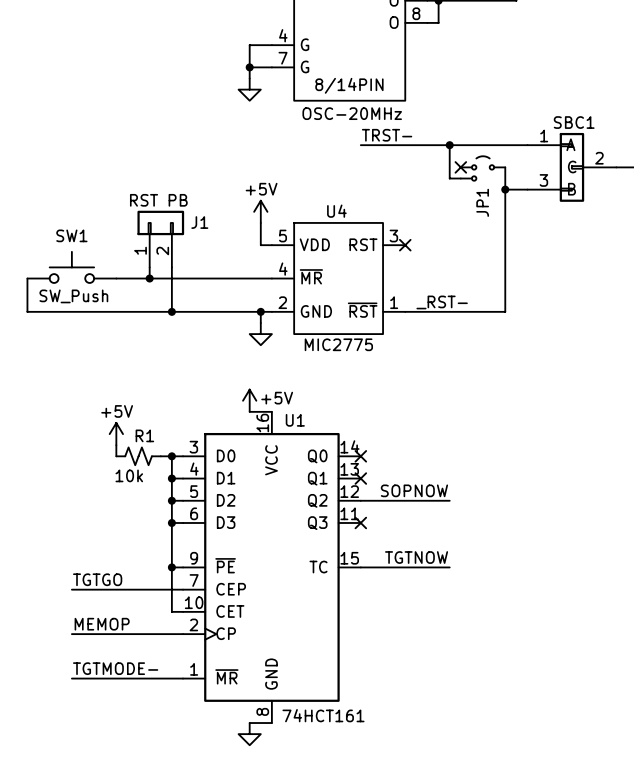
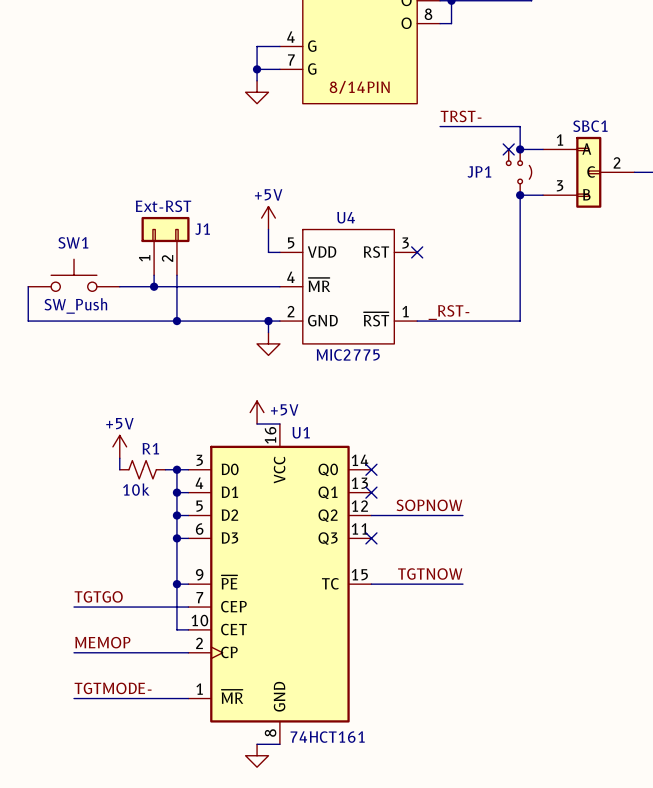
part value: OSC-20MHz (352, 113) -> none
label position: TRST- (387, 135) -> TRST- (461, 116)
wire: (360, 145) (505, 145) -> (440, 126) (520, 126) (520, 149)
wire: (449, 145) (449, 178) (460, 178) -> none
junction: (449, 145) -> none
junction: none -> (520, 149)
no-connect mark position: (460, 167) -> (508, 149)
JP1 rotation: 0° (483, 168) -> 90° clockwise (519, 172)
J1 text: RST PB (158, 200) -> Ext-RST (163, 206)

